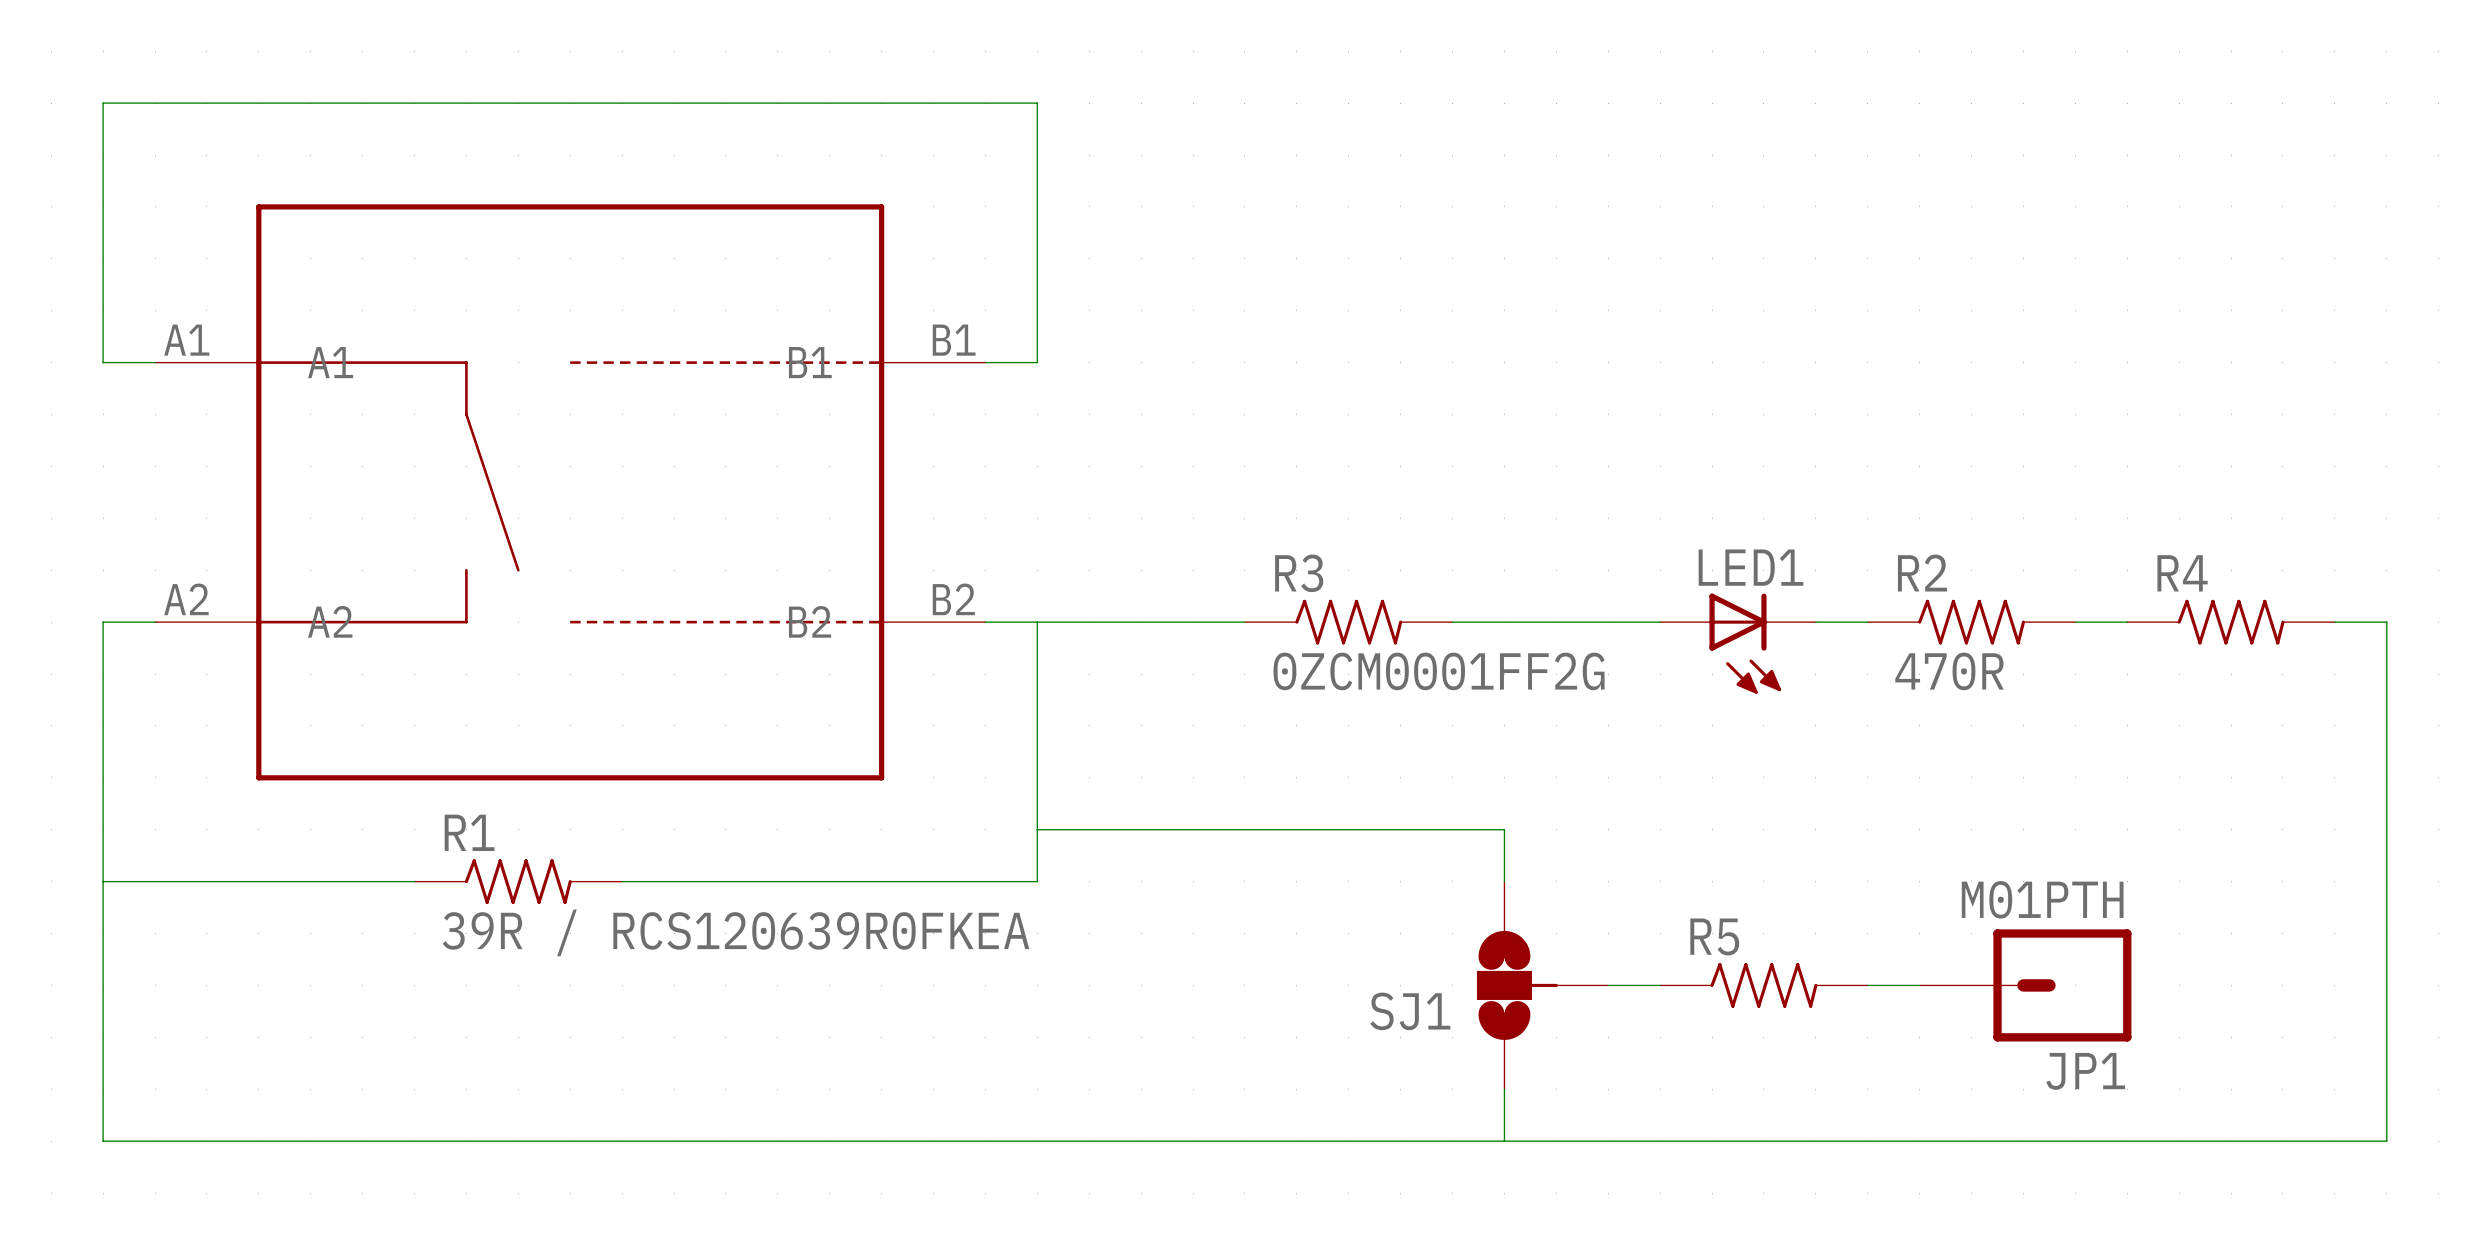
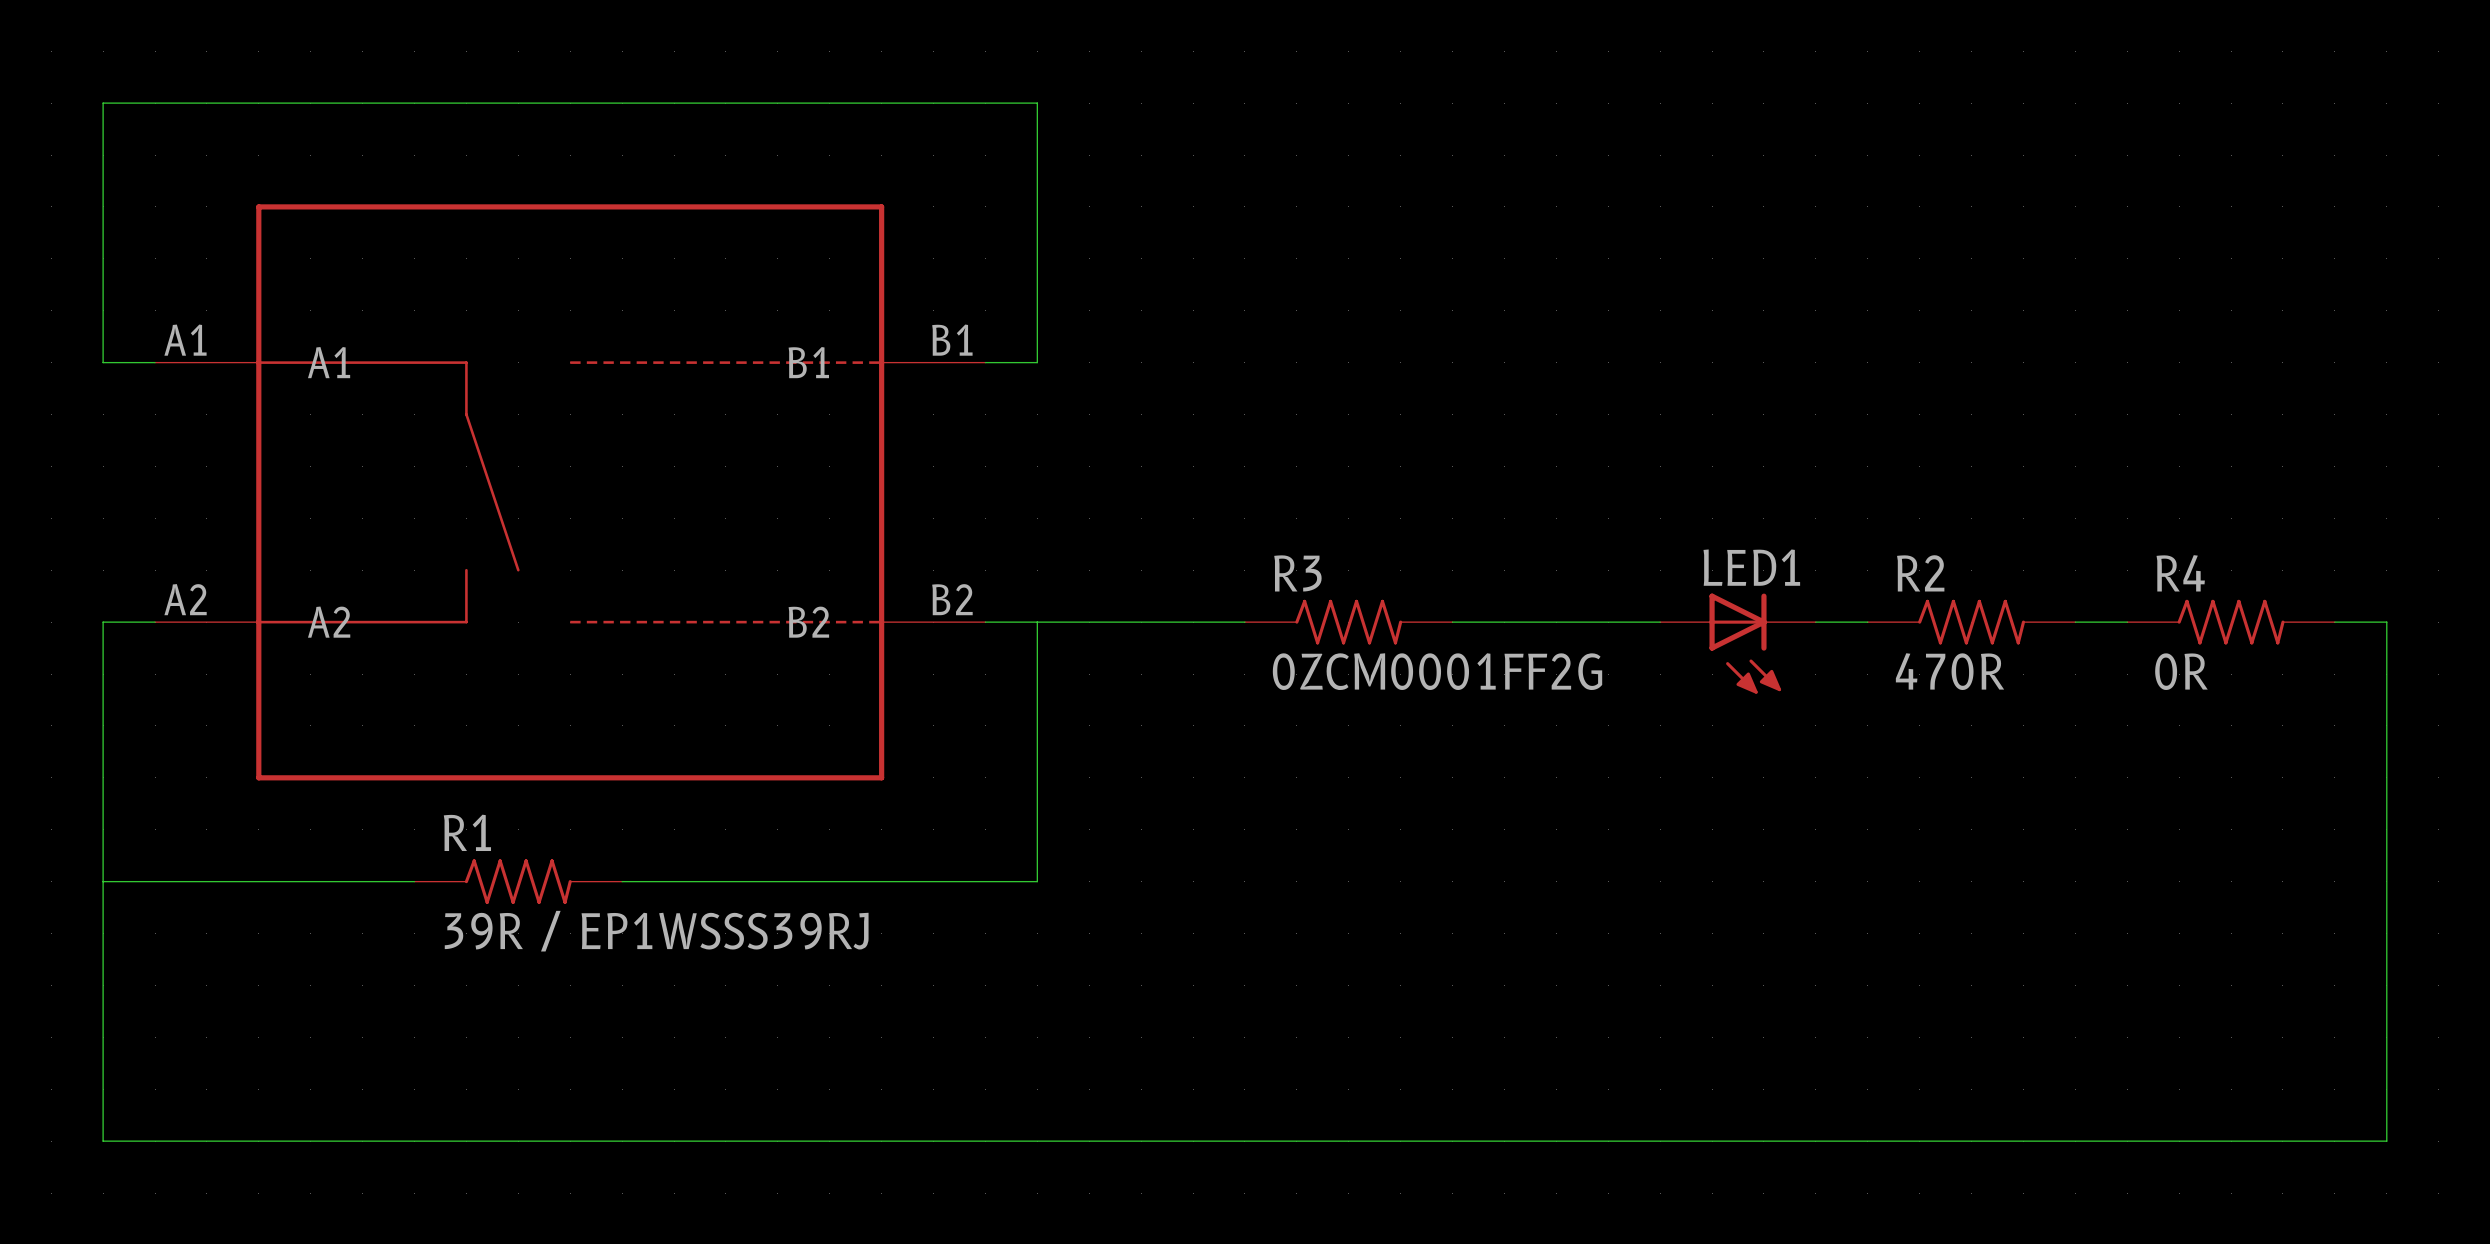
R4 value: none -> 0R (2181, 671)
wire: (1037, 829) (1504, 829) (1504, 881) -> none
R1 value: 39R / RCS120639R0FKEA (736, 932) -> 39R / EP1WSSS39RJ (656, 931)
SJ1: (1542, 985) -> none
wire: (1608, 985) (1660, 985) -> none
R5: (1763, 985) -> none
wire: (1867, 985) (1919, 985) -> none
JP1: M01PTH (2025, 985) -> none
wire: (1504, 1089) (1504, 1141) -> none

